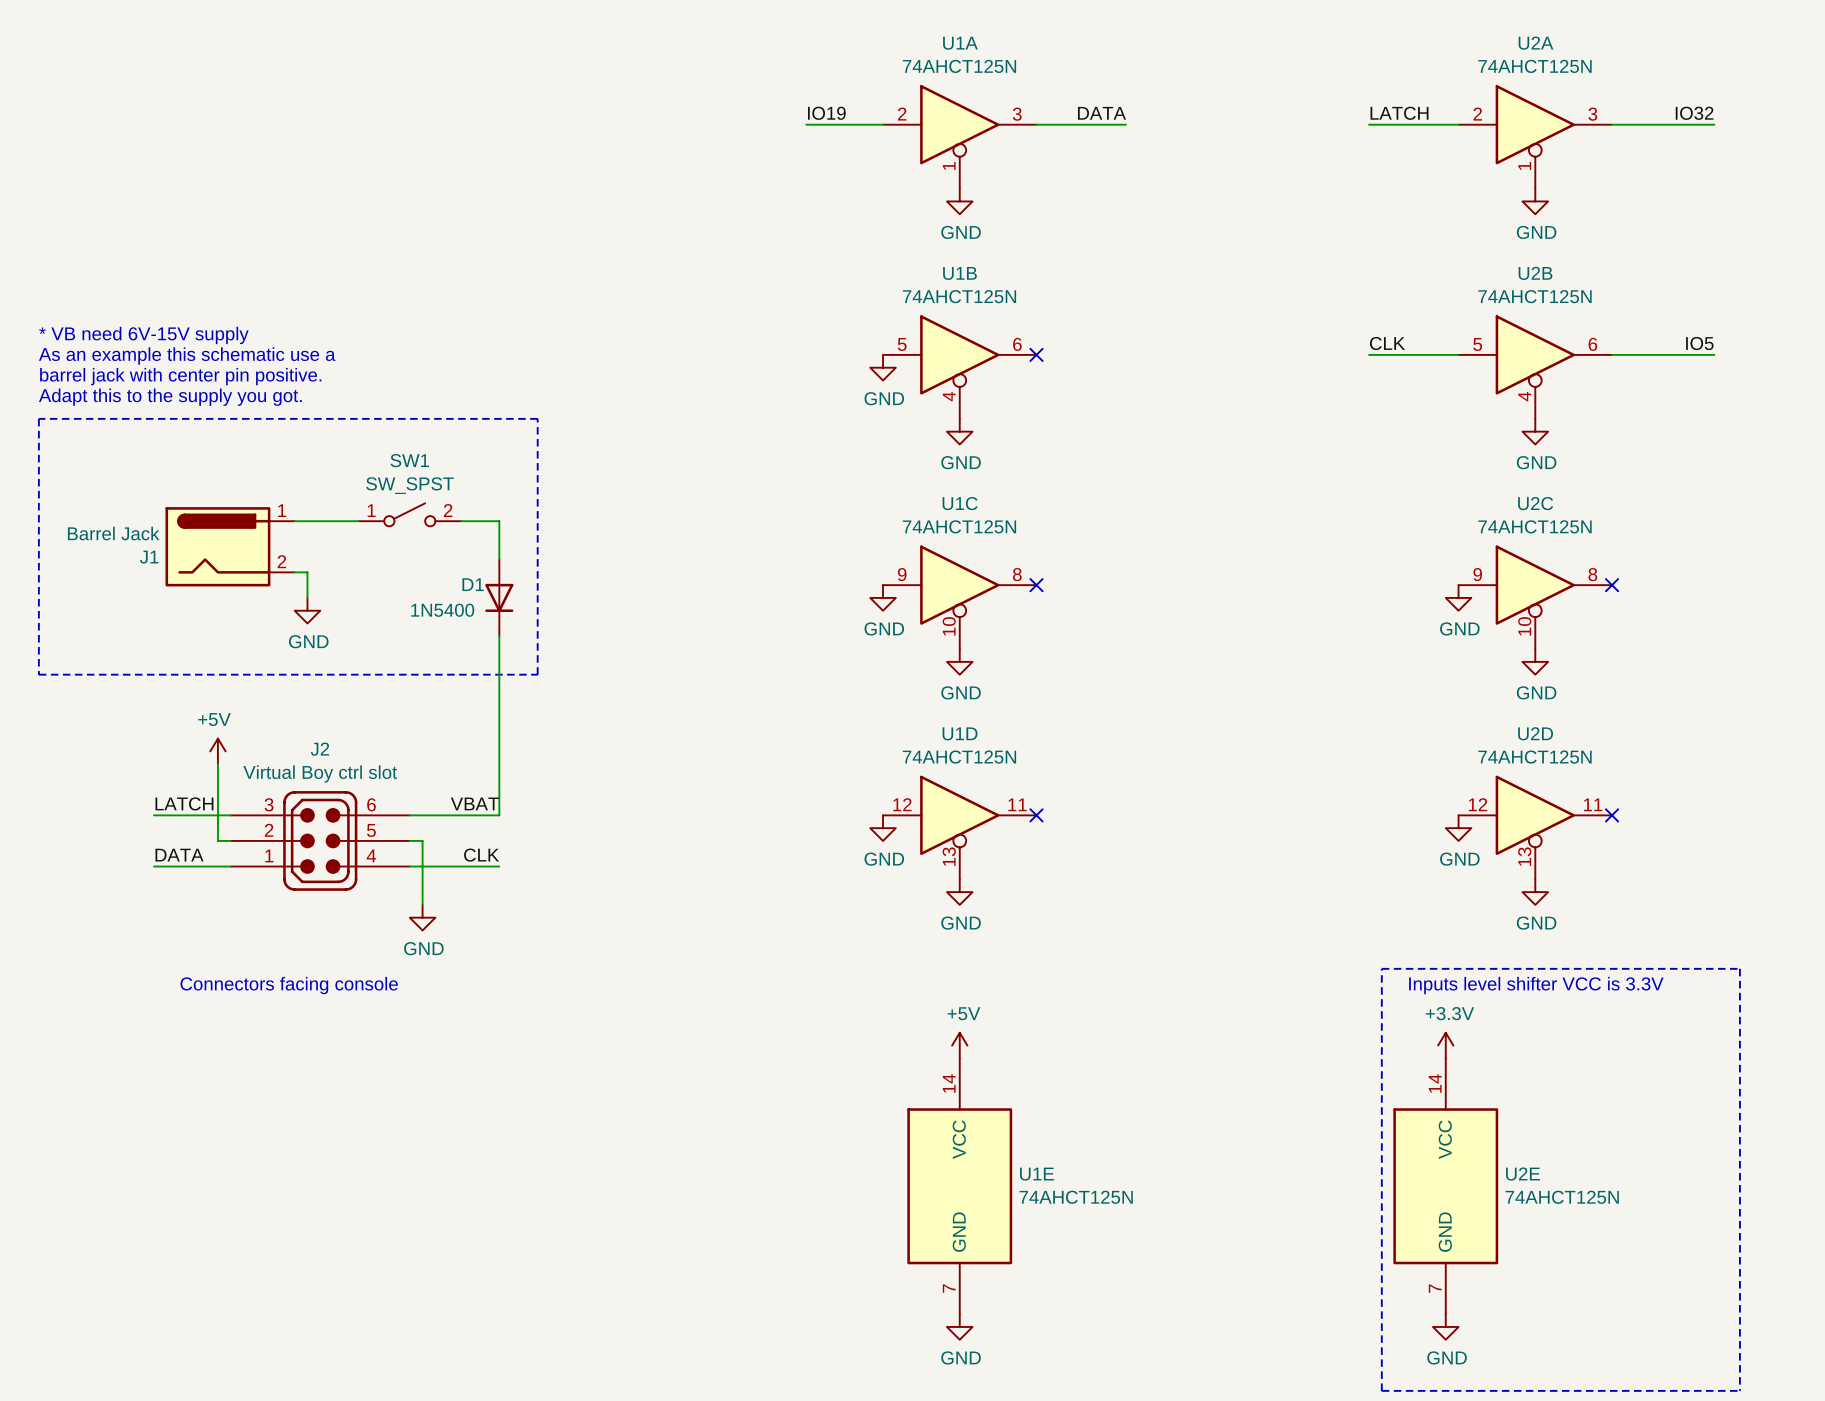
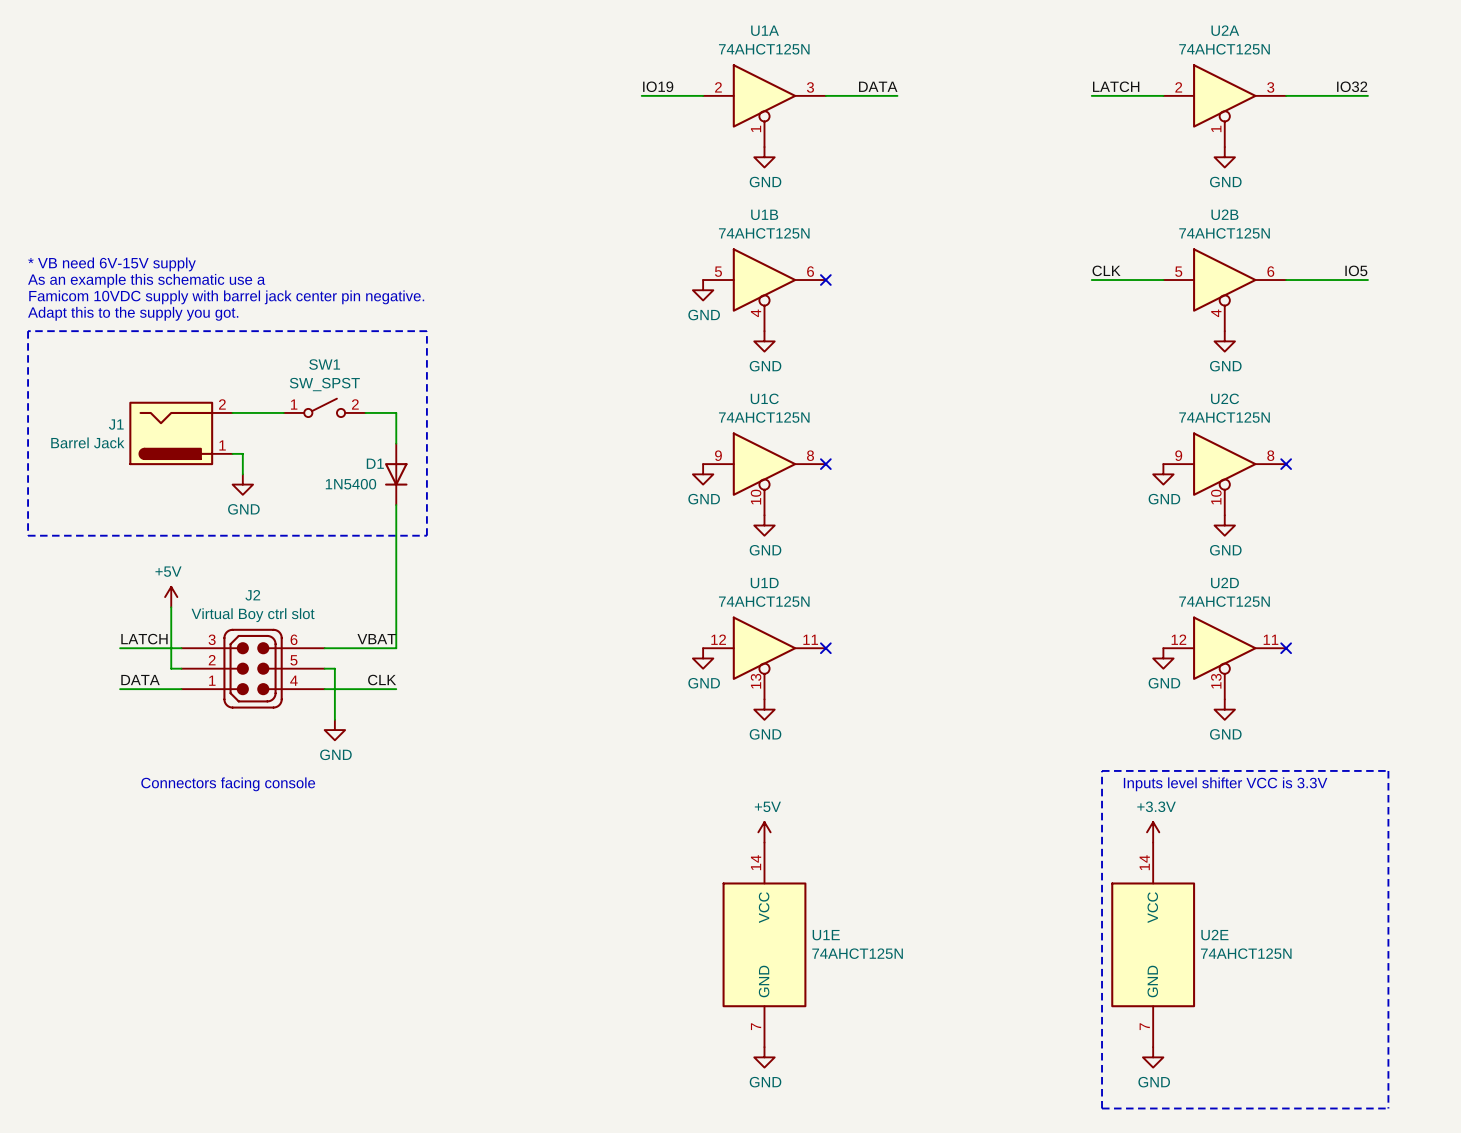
text: barrel jack with center pin positive. (180, 376) -> Famicom 10VDC supply with barrel jack center pin negative. (226, 297)
J1 flip: as is (217, 546) -> up-down (171, 433)

